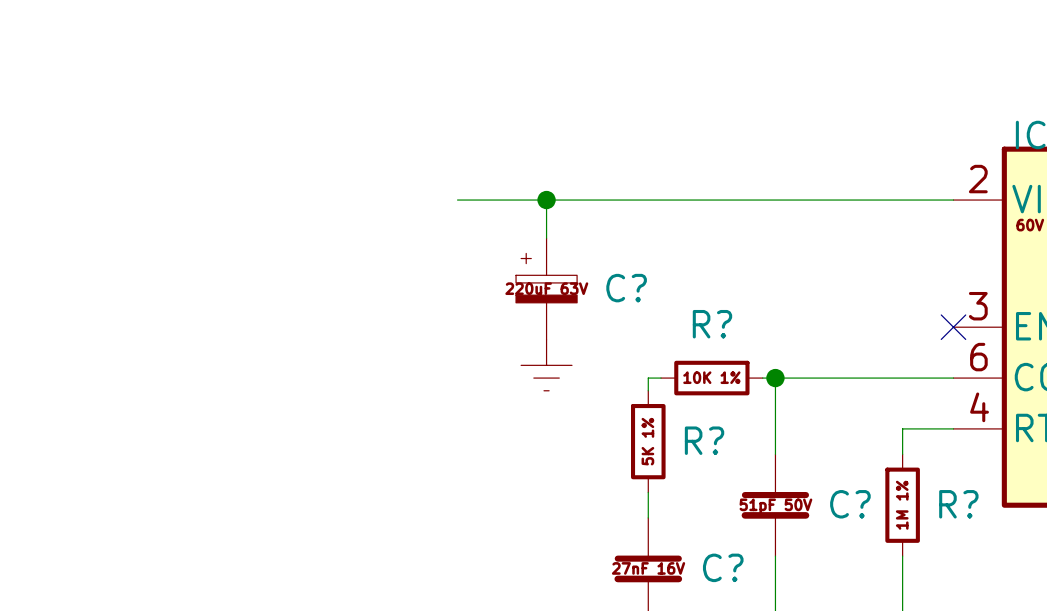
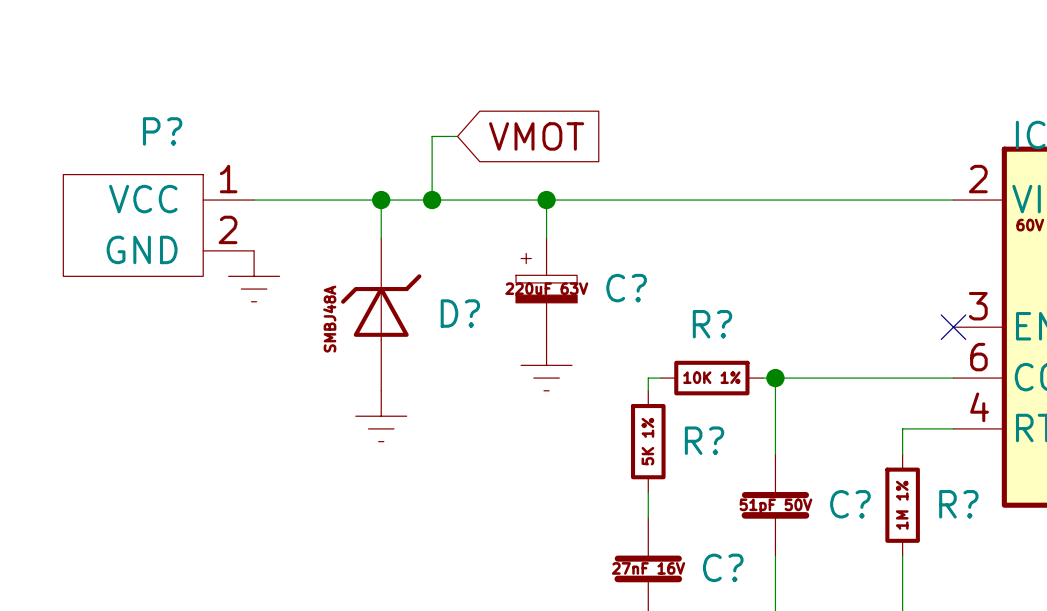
wire: none -> (457, 136) (432, 136) (432, 200)
global label: none -> VMOT (536, 136)
wire: none -> (254, 200) (457, 200)
wire: none -> (381, 200) (381, 238)
junction: none -> (381, 200)
junction: none -> (432, 200)
P?: none -> (158, 225)
power symbol: none -> (254, 276)
D?: none -> (381, 314)
power symbol: none -> (381, 416)

